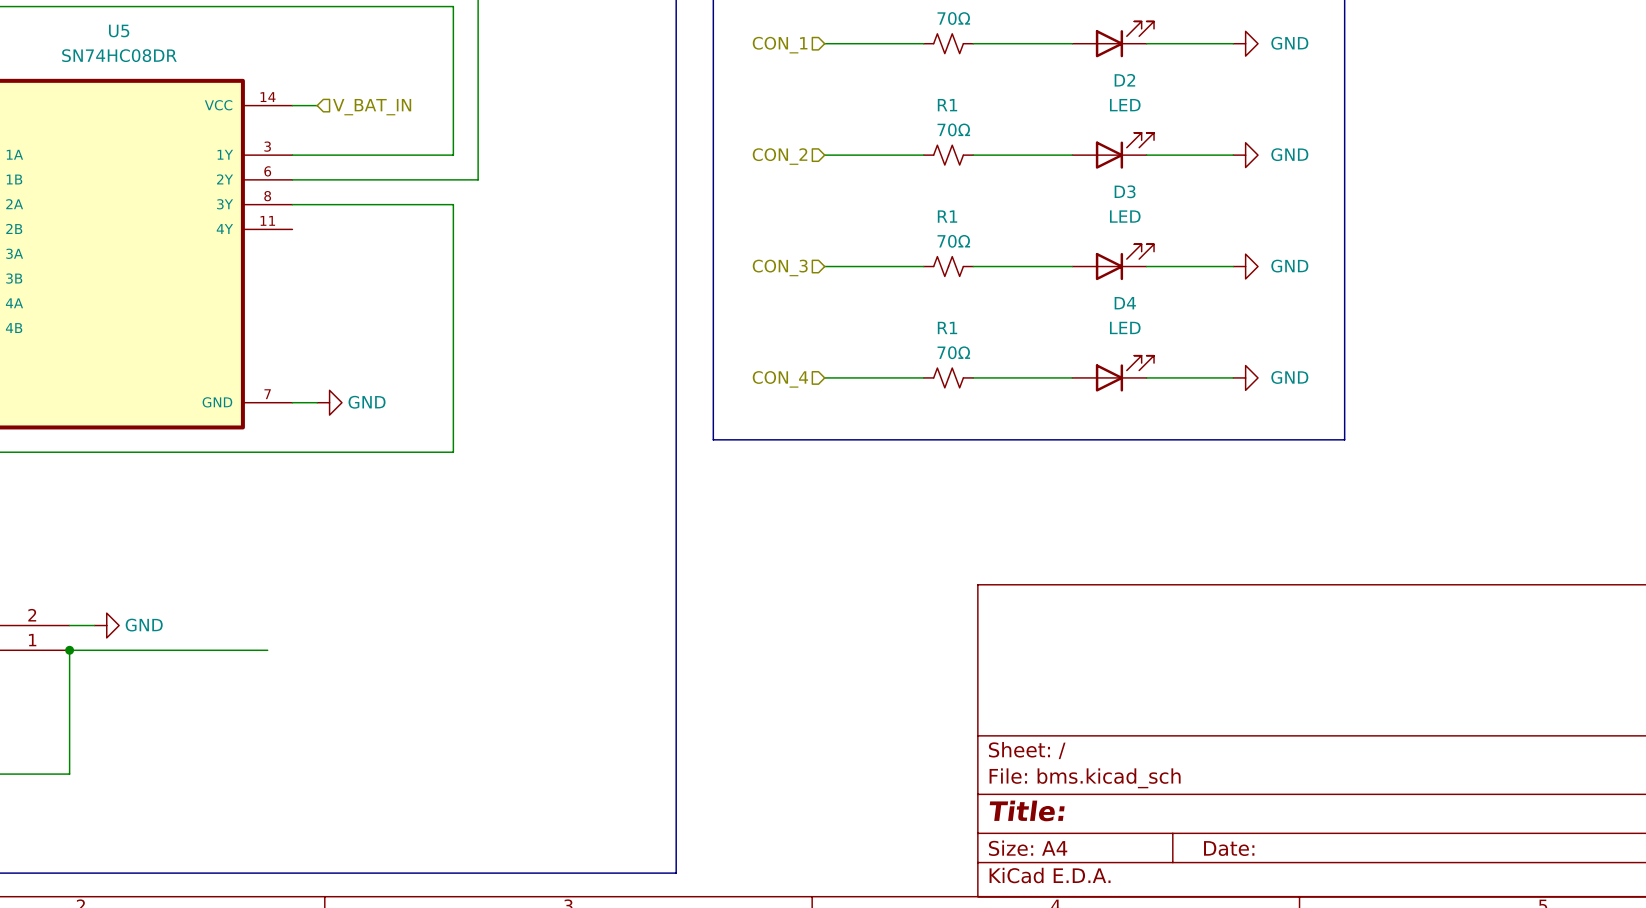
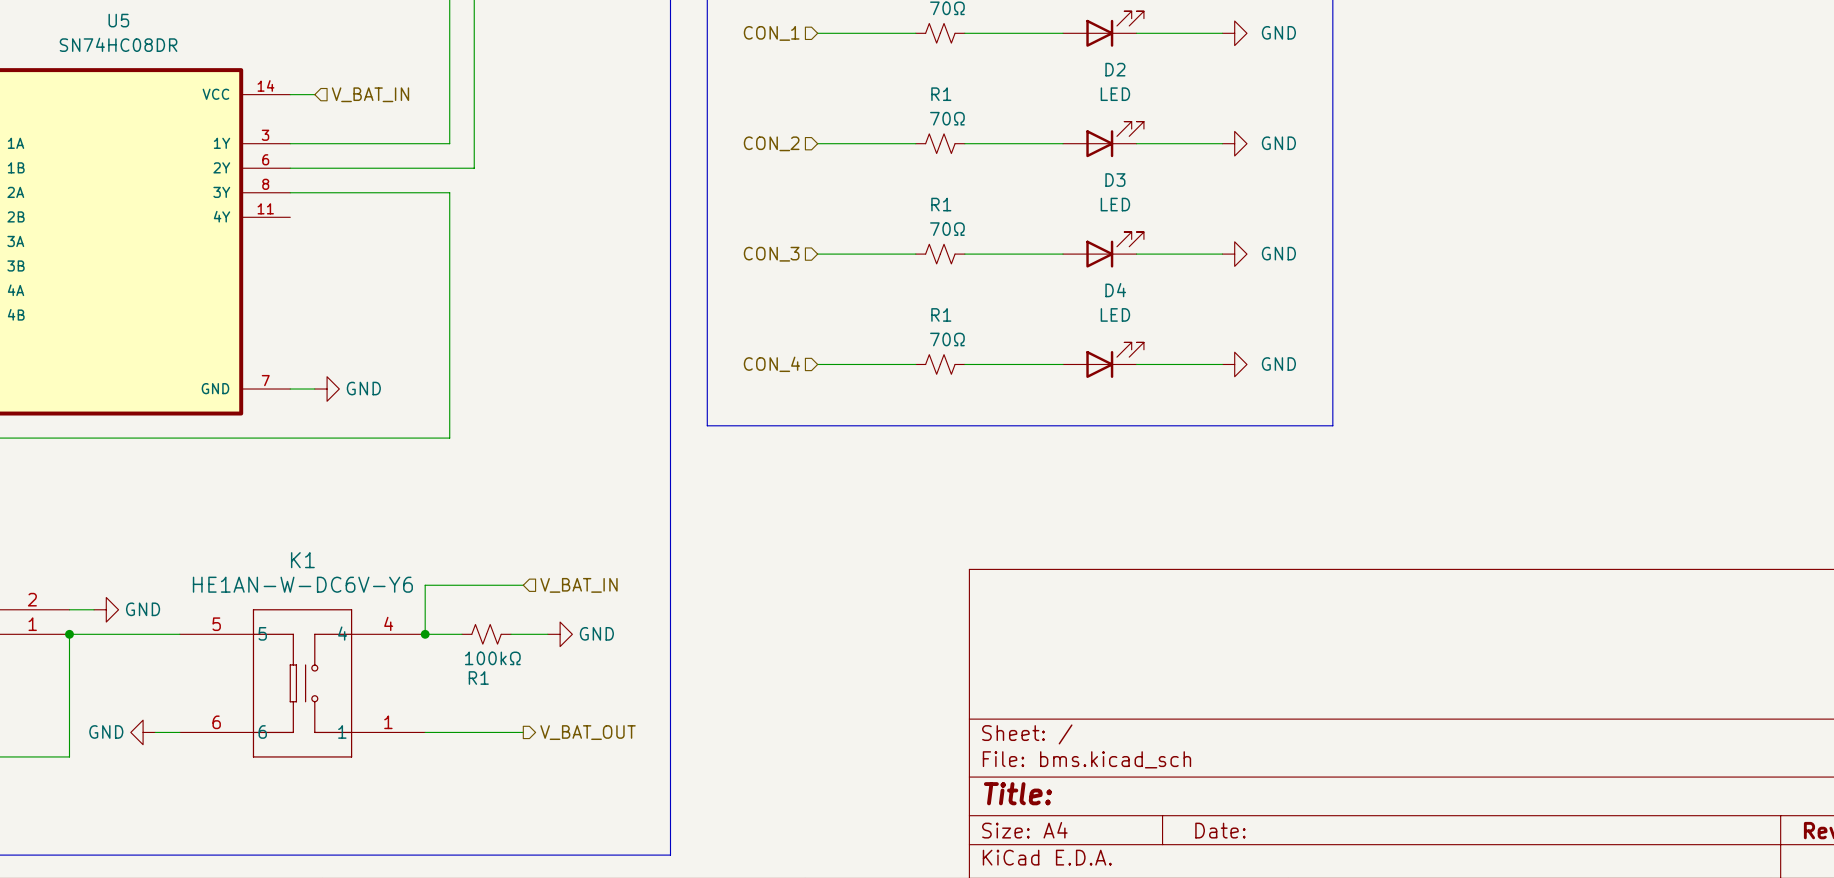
wire: none -> (523, 585) (425, 585) (425, 634) (461, 634)
hierarchical label: none -> V_BAT_IN (578, 585)
junction: none -> (425, 634)
R1: none -> 100kΩ (486, 634)
wire: none -> (511, 634) (547, 634)
power symbol: none -> GND (560, 634)
K1: none -> HE1AN-W-DC6V-Y6 (302, 683)
power symbol: none -> GND (143, 732)
wire: none -> (155, 732) (179, 732)
wire: none -> (425, 732) (523, 732)
hierarchical label: none -> V_BAT_OUT (588, 732)

